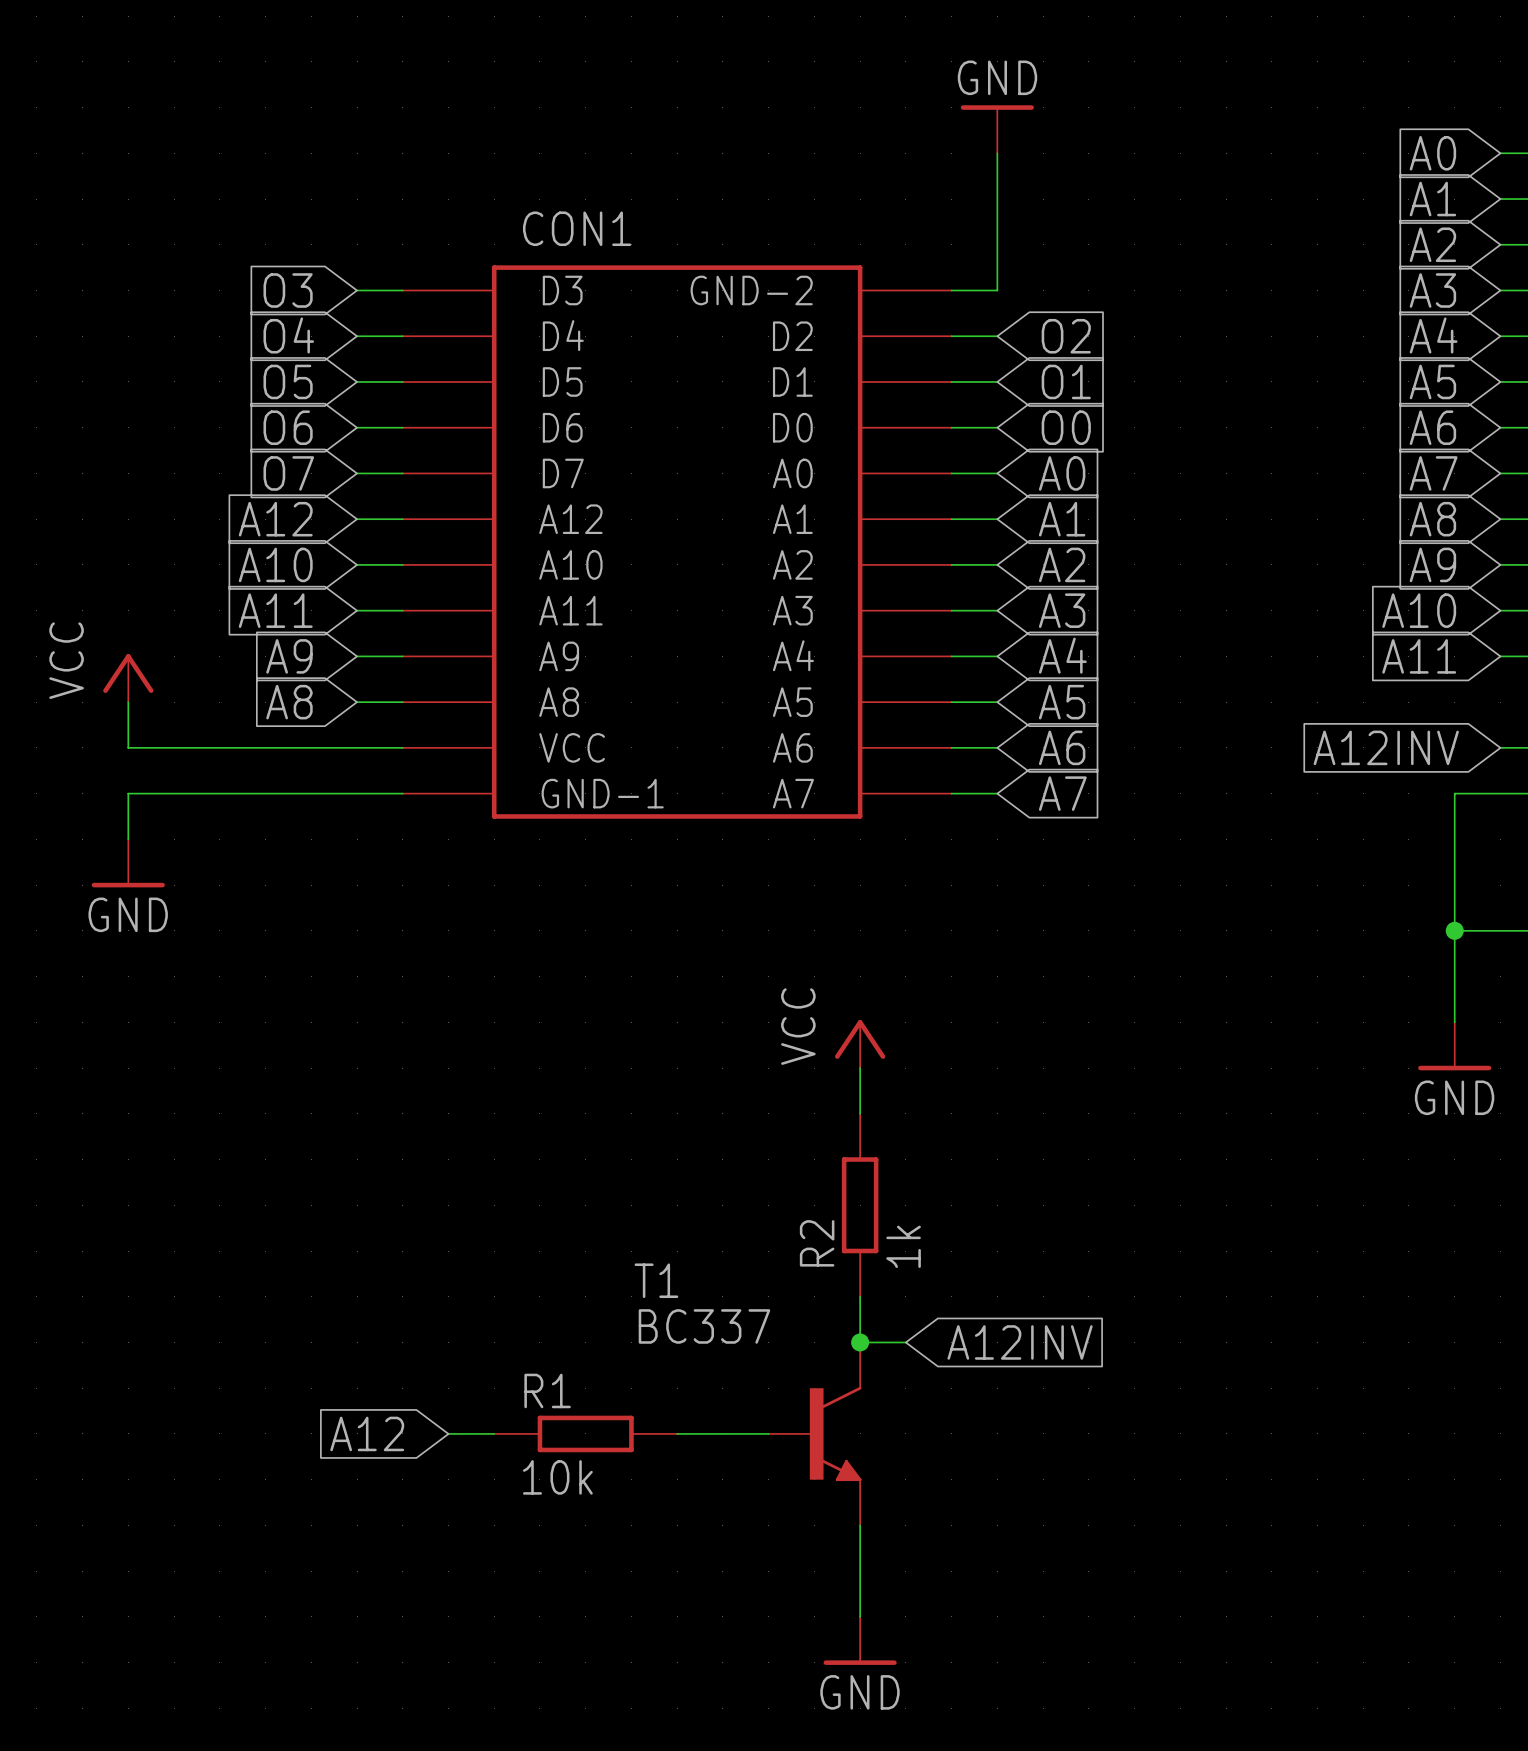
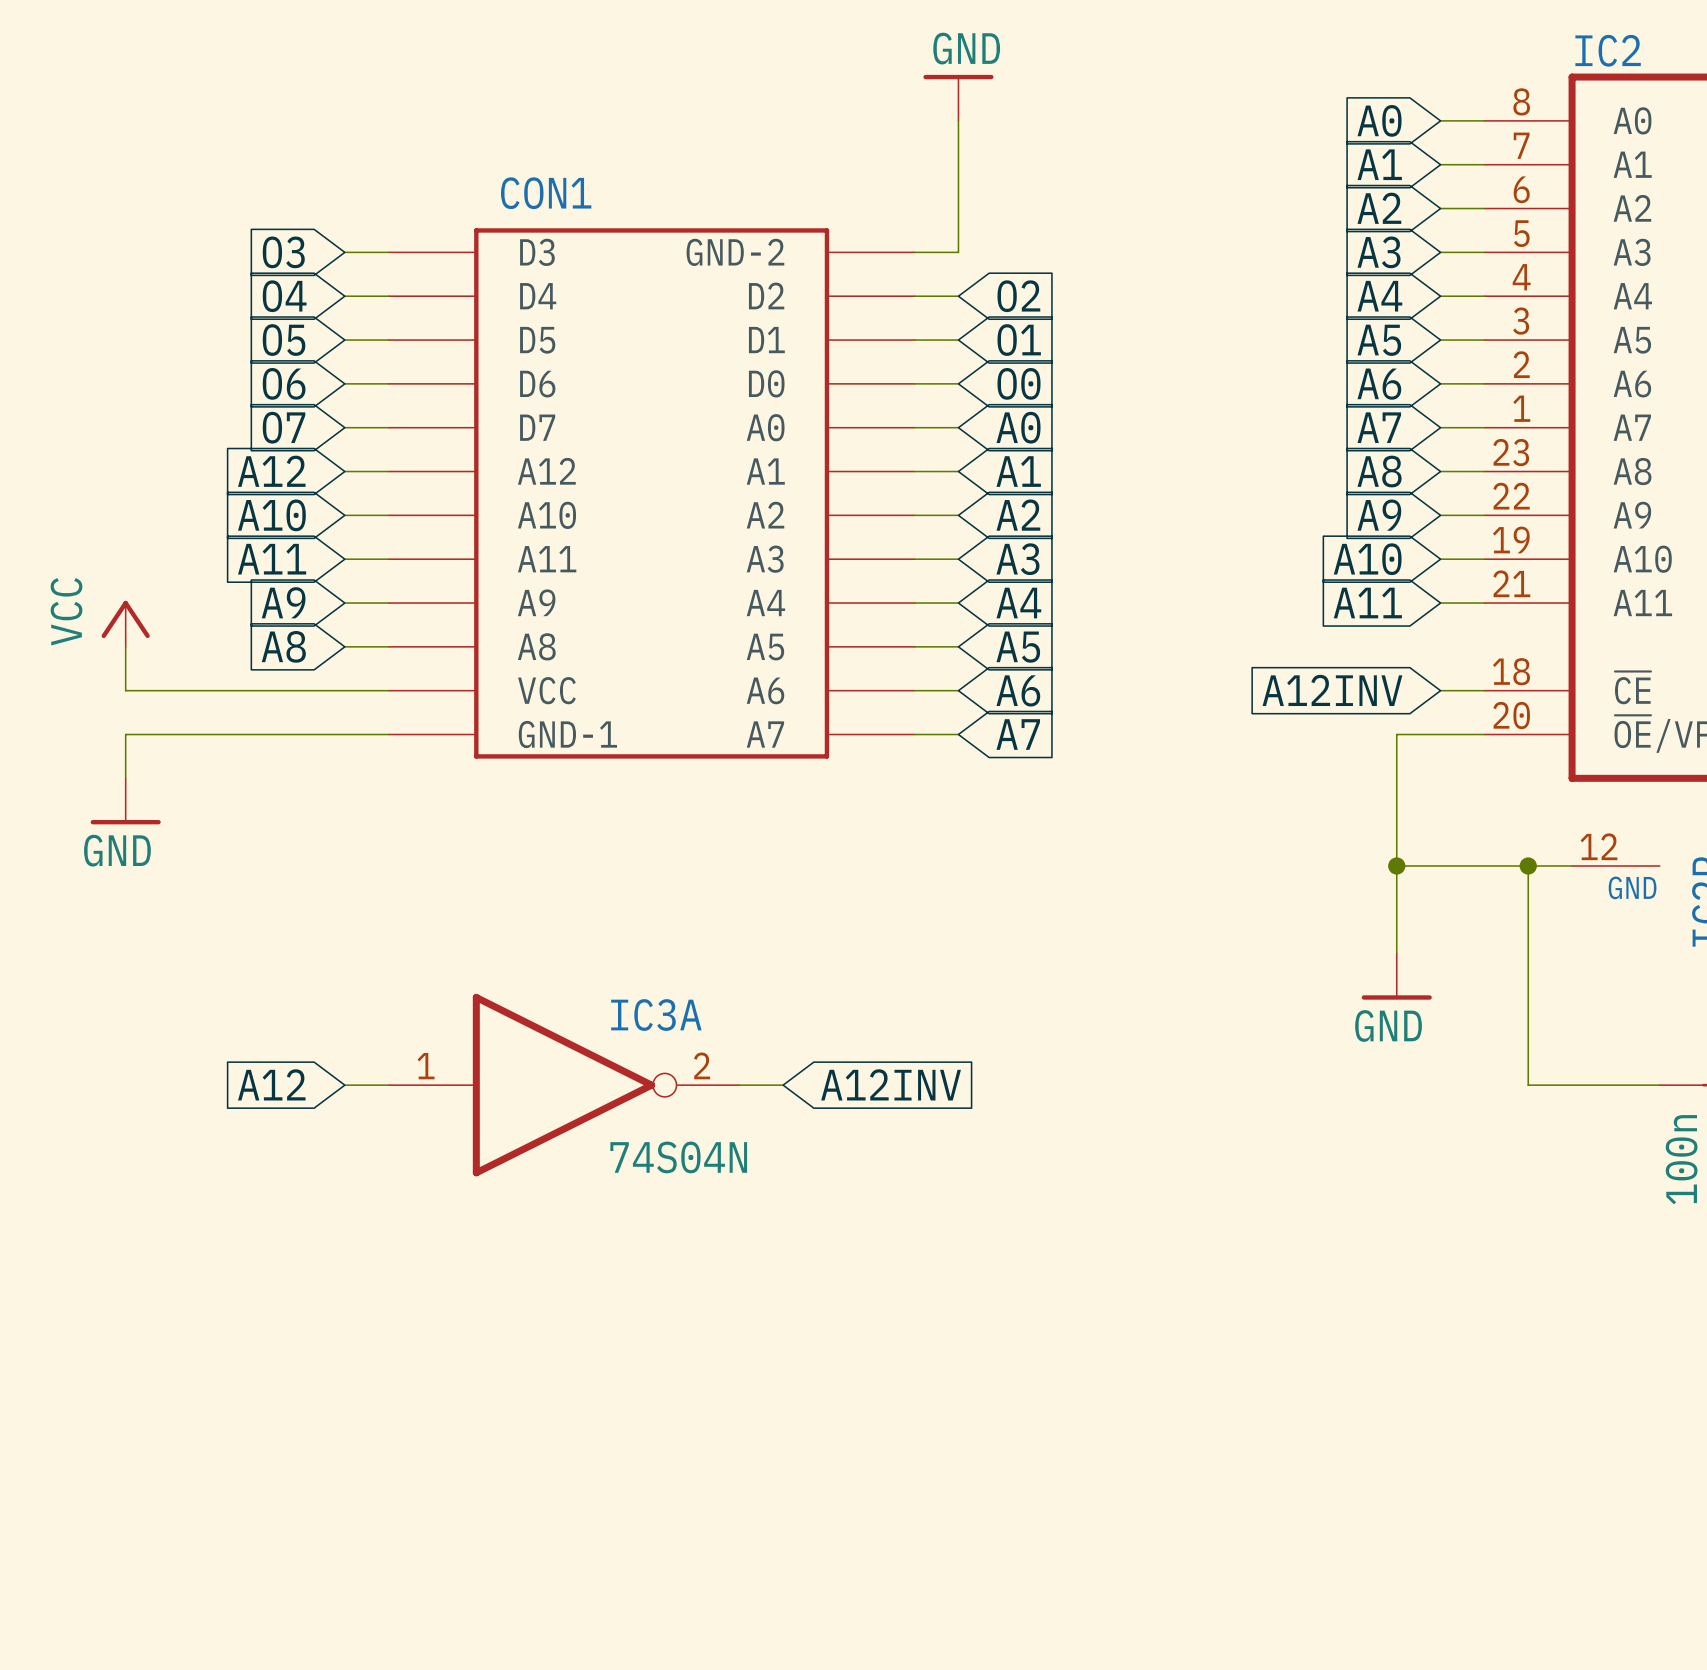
power symbol: VCC (860, 1044) -> none
wire: (860, 1068) (860, 1113) -> none
IC3A: none -> 74S04N (563, 1085)
wire: none -> (739, 1085) (783, 1085)
R2: 1k (860, 1205) -> none
wire: (860, 1296) (860, 1342) (905, 1342) -> none
junction: (860, 1342) -> none
global label position: A12INV (1020, 1342) -> A12INV (891, 1084)
global label position: A12 (367, 1433) -> A12 (271, 1084)
wire: (448, 1433) (494, 1433) -> (344, 1085) (388, 1085)
R1: 10k (585, 1433) -> none
wire: (677, 1433) (768, 1433) -> none
T1: BC337 (815, 1433) -> none
wire: (860, 1525) (860, 1616) -> none
power symbol: GND (860, 1640) -> none

